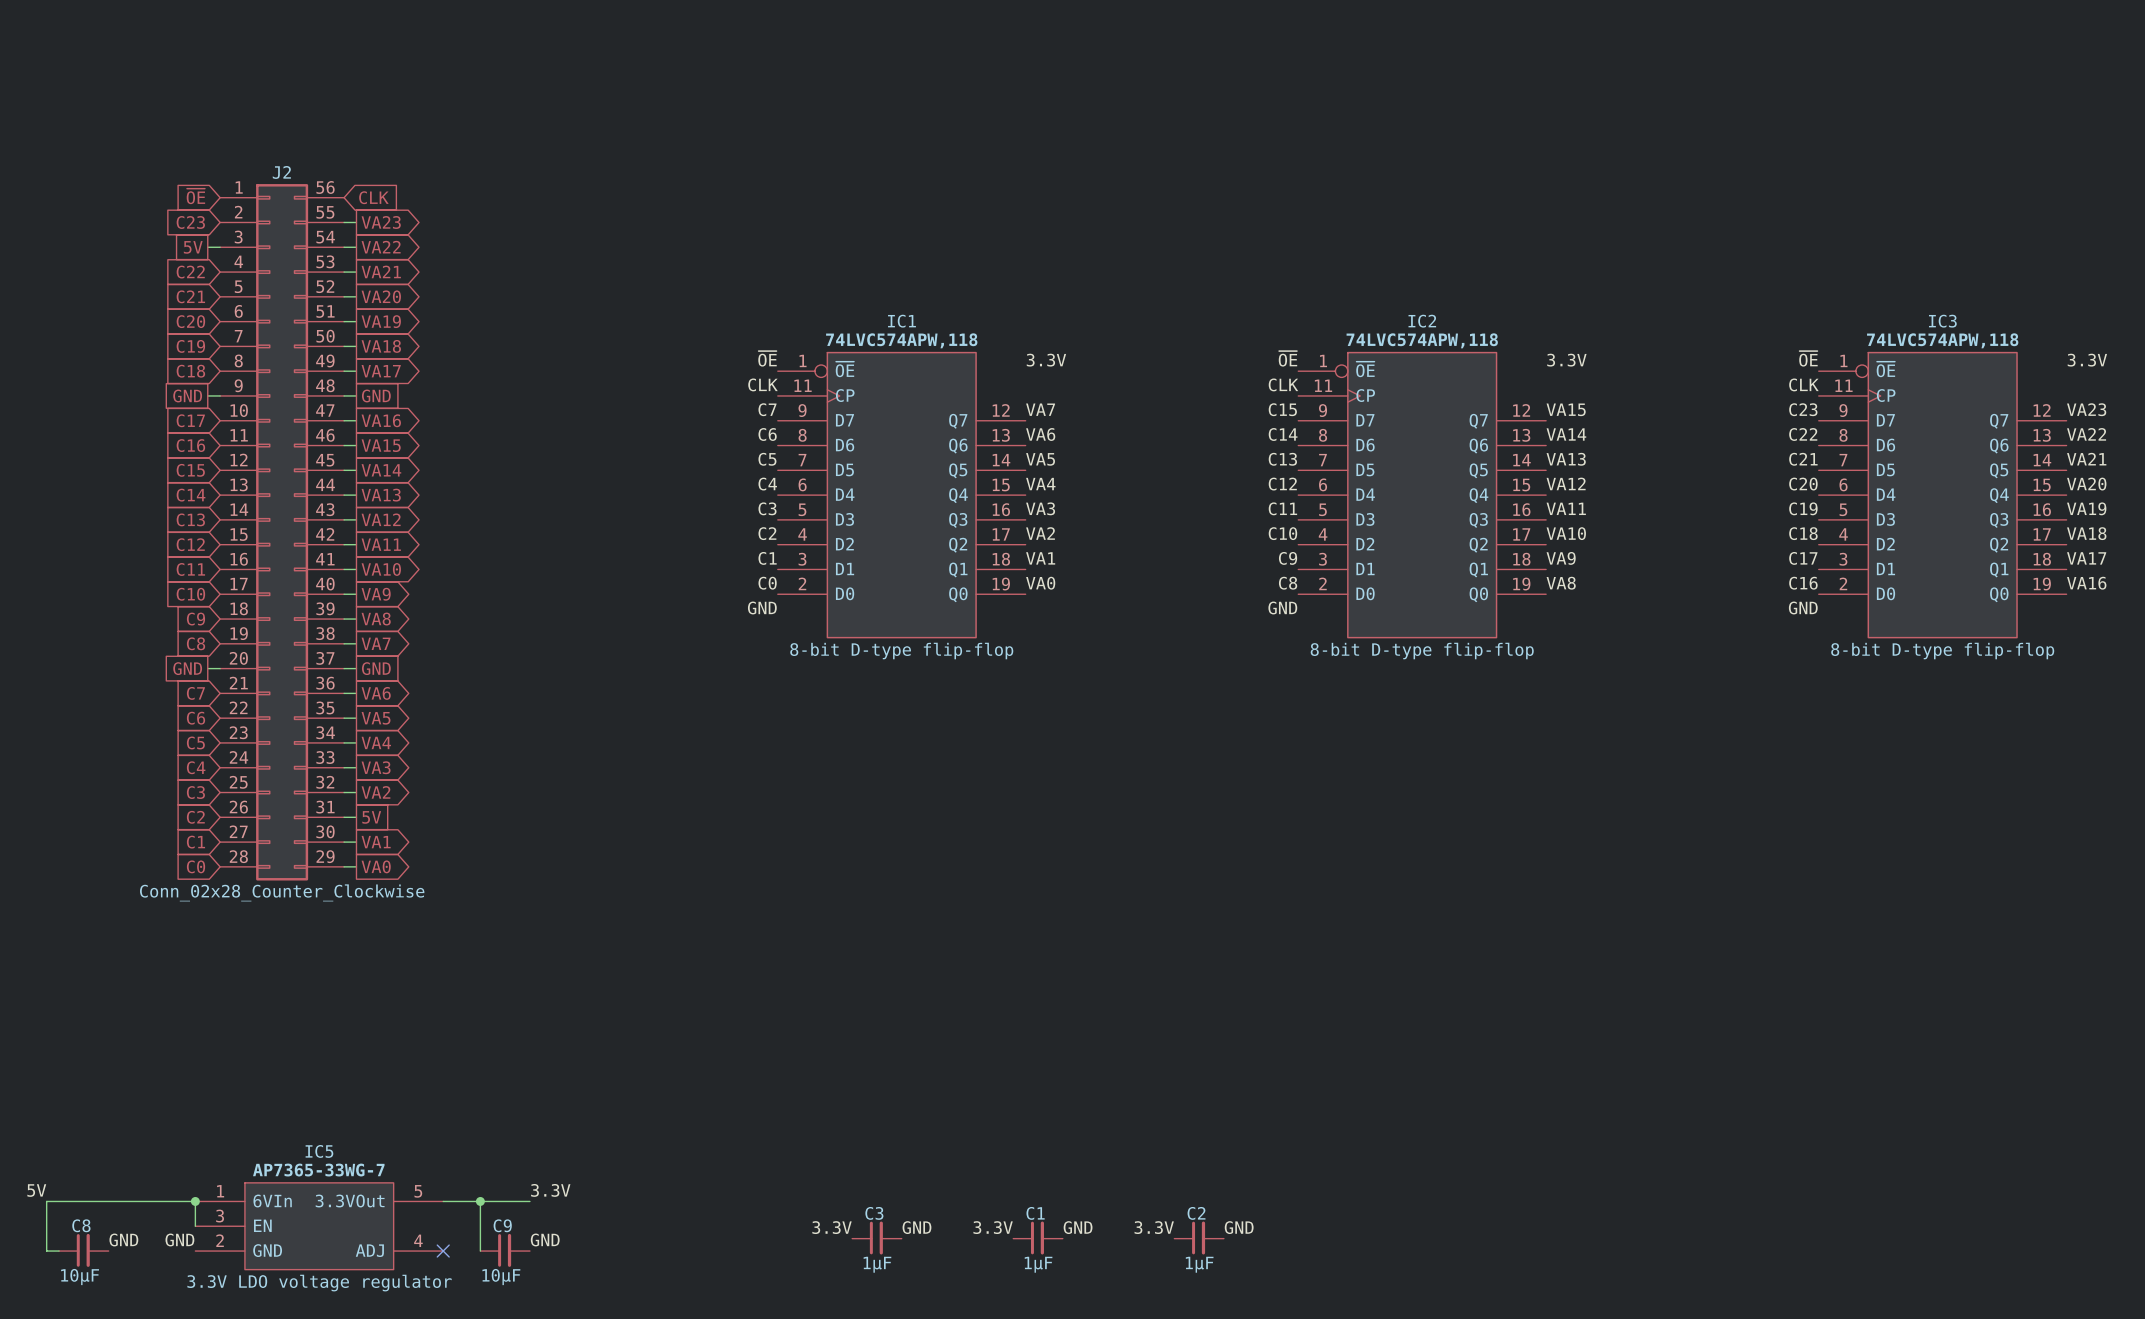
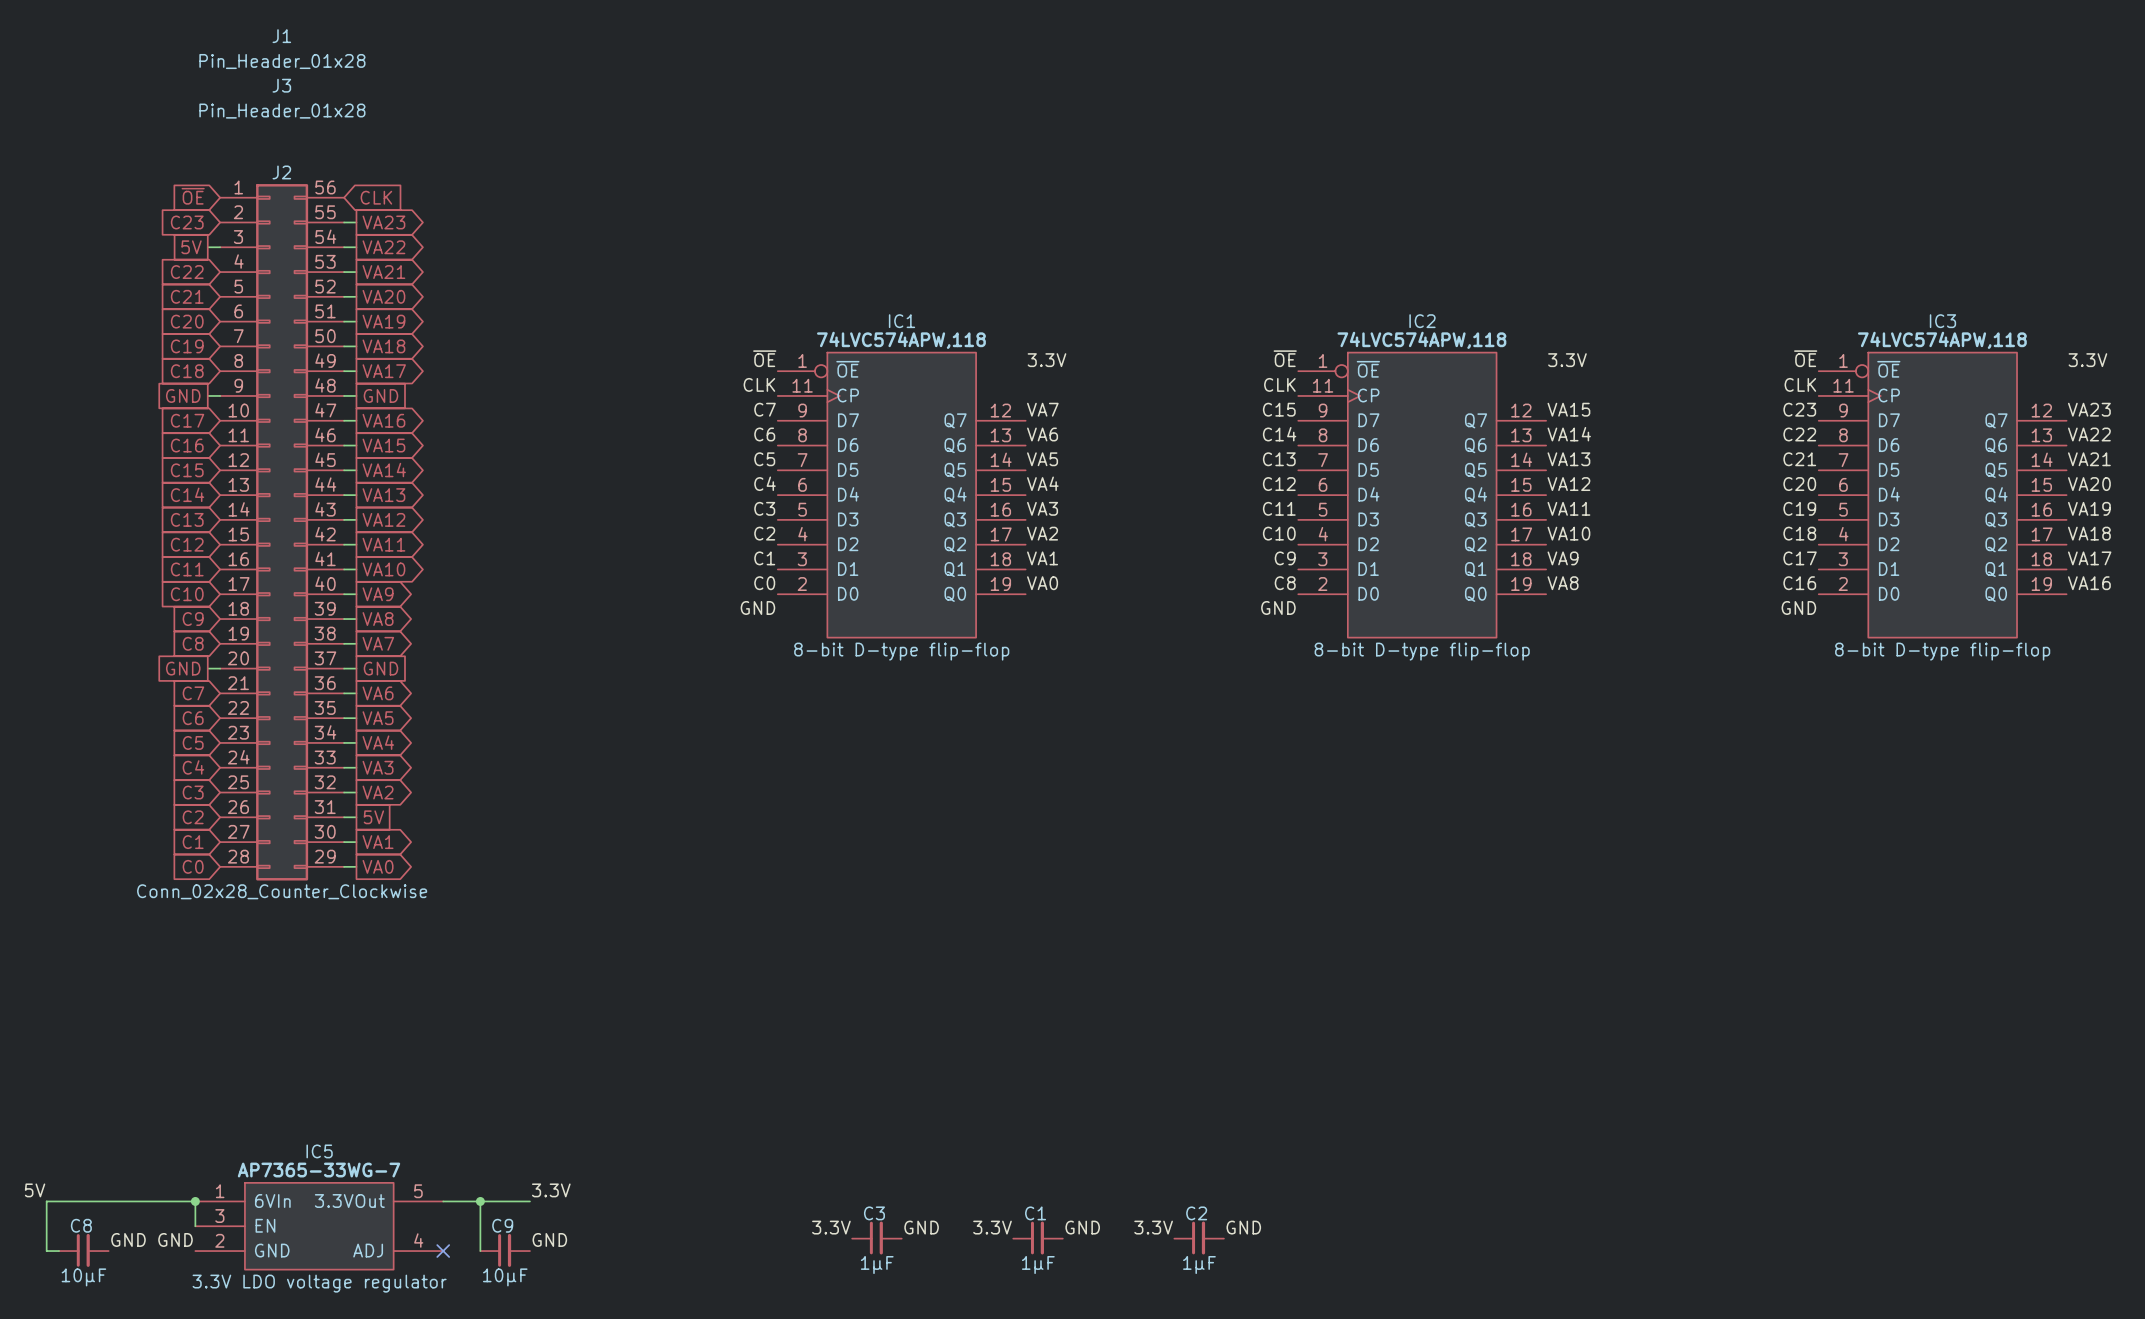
J1: none -> Pin_Header_01x28 (282, 49)
J3: none -> Pin_Header_01x28 (282, 98)

